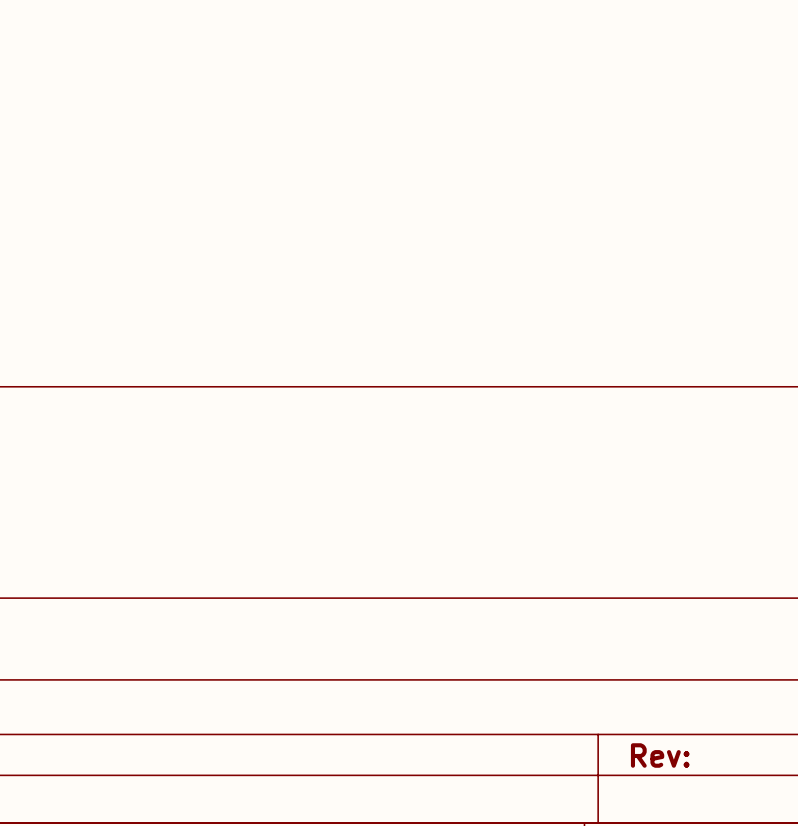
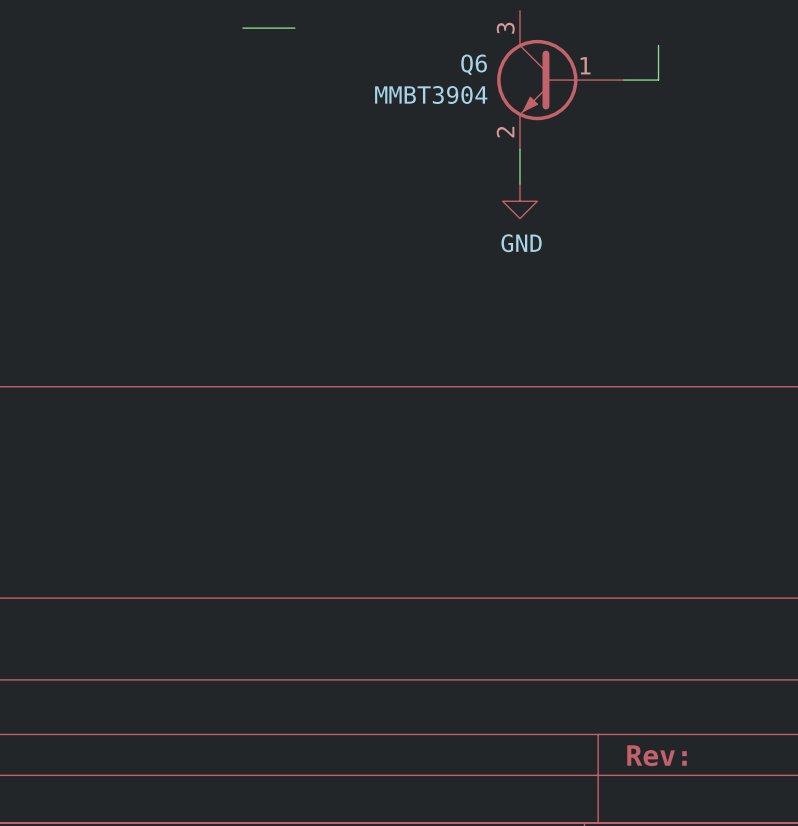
wire: none -> (242, 28) (294, 28)
wire: none -> (658, 45) (658, 80) (623, 80)
Q6: none -> MMBT3904 (560, 80)
wire: none -> (519, 149) (519, 183)
power symbol: none -> GND (519, 201)

